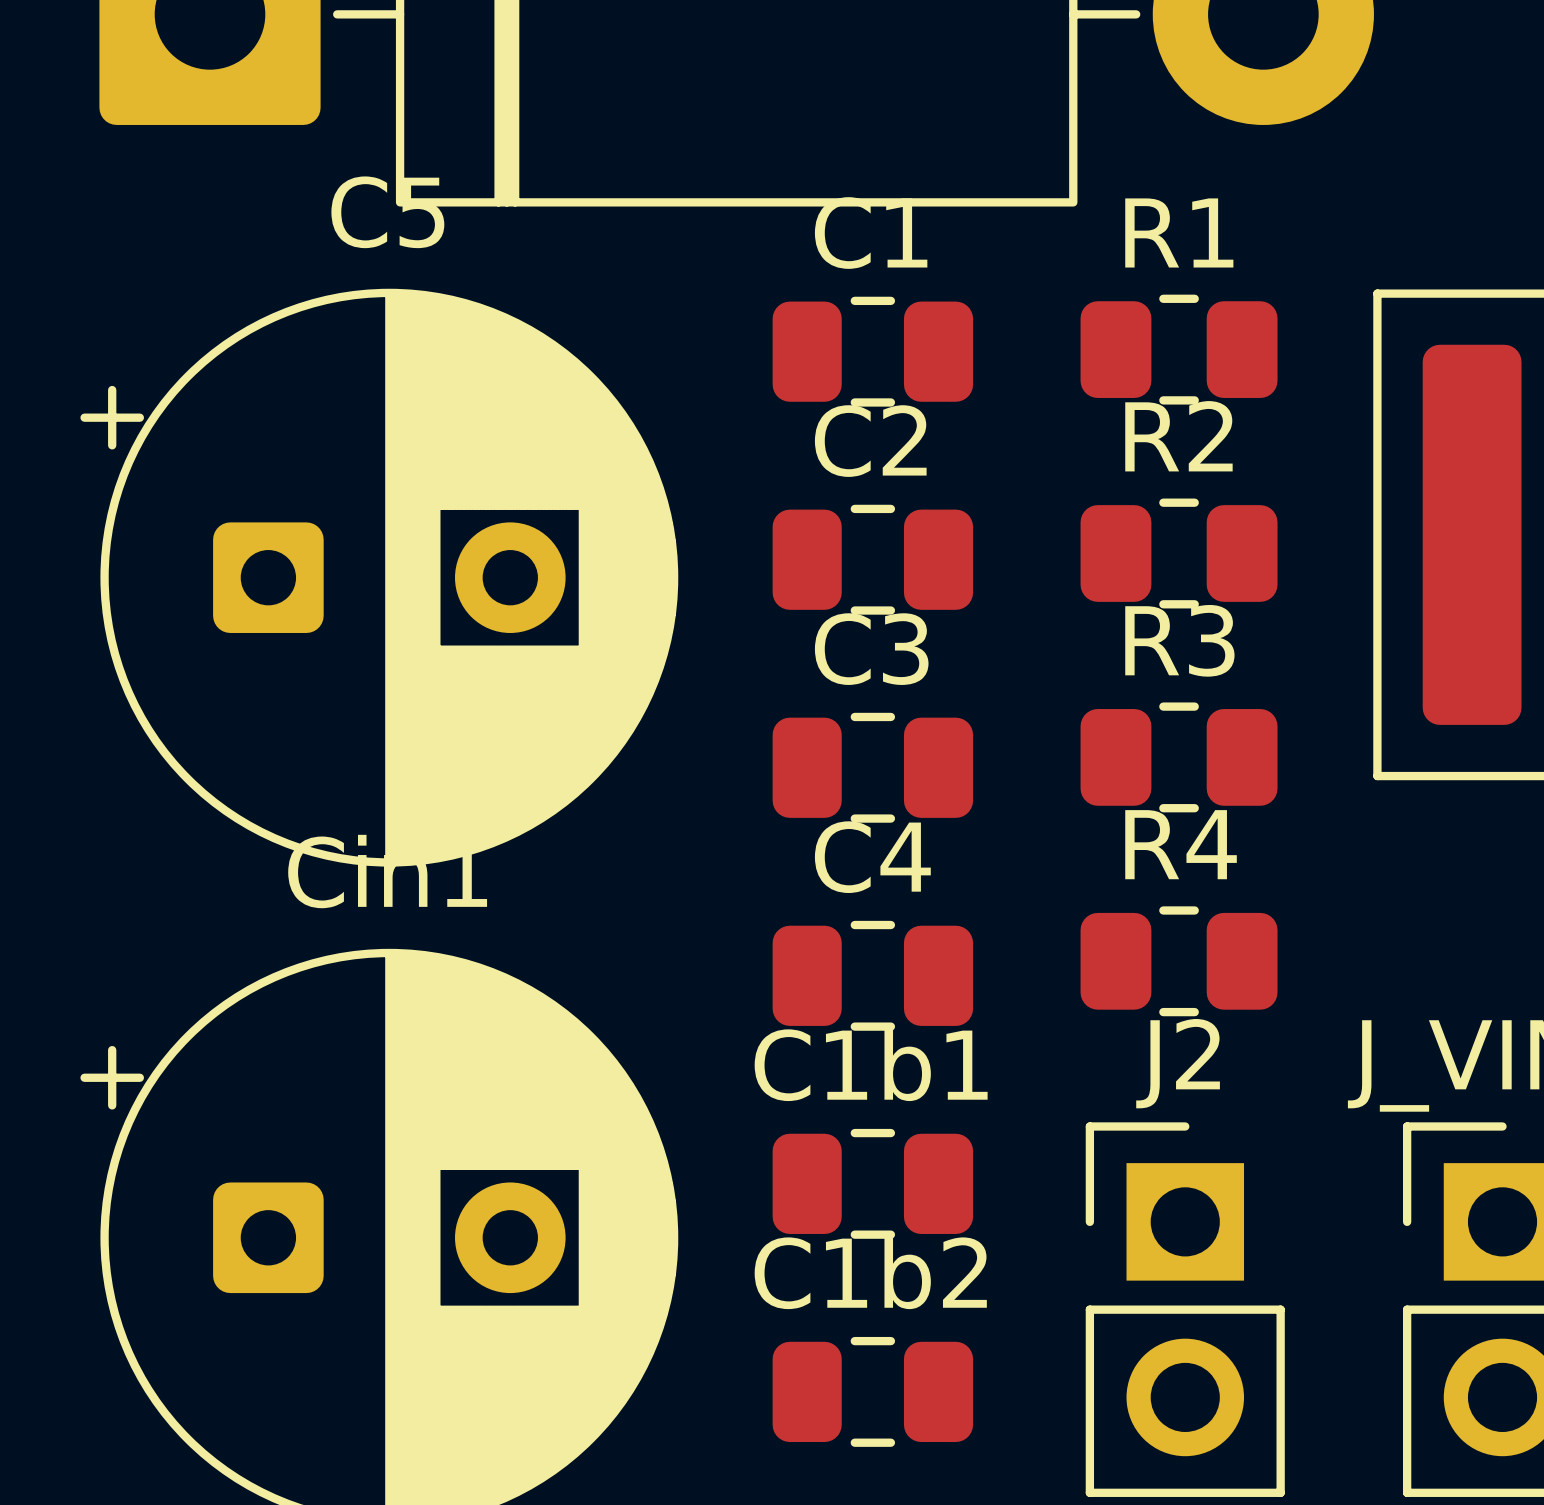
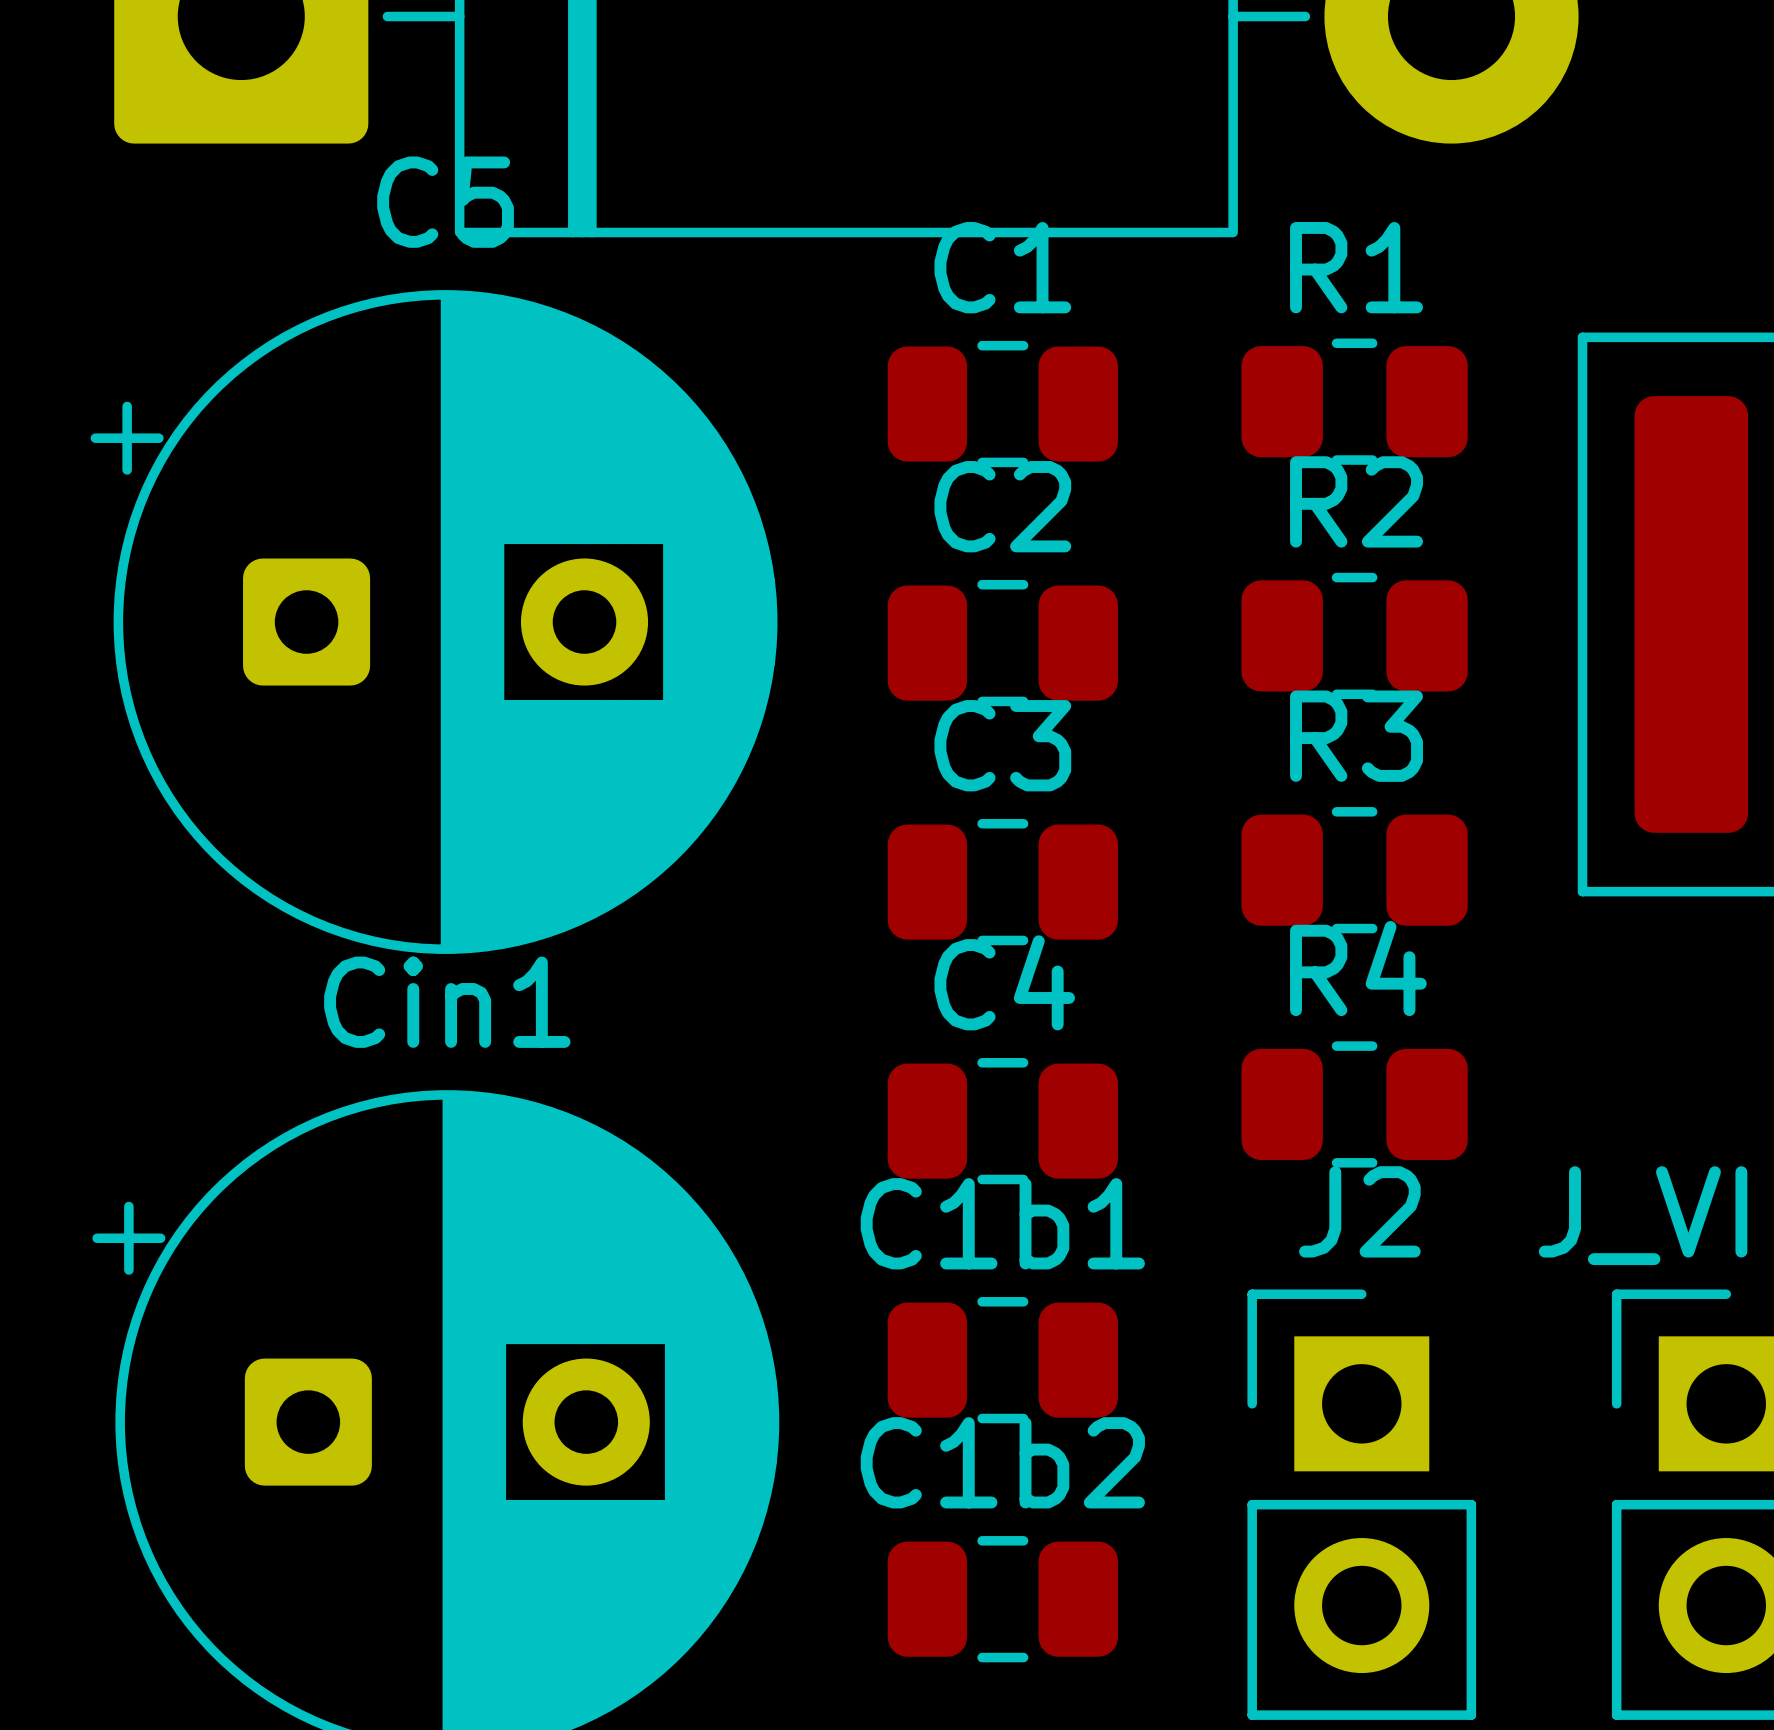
C5 position: (379, 577) -> (434, 622)

